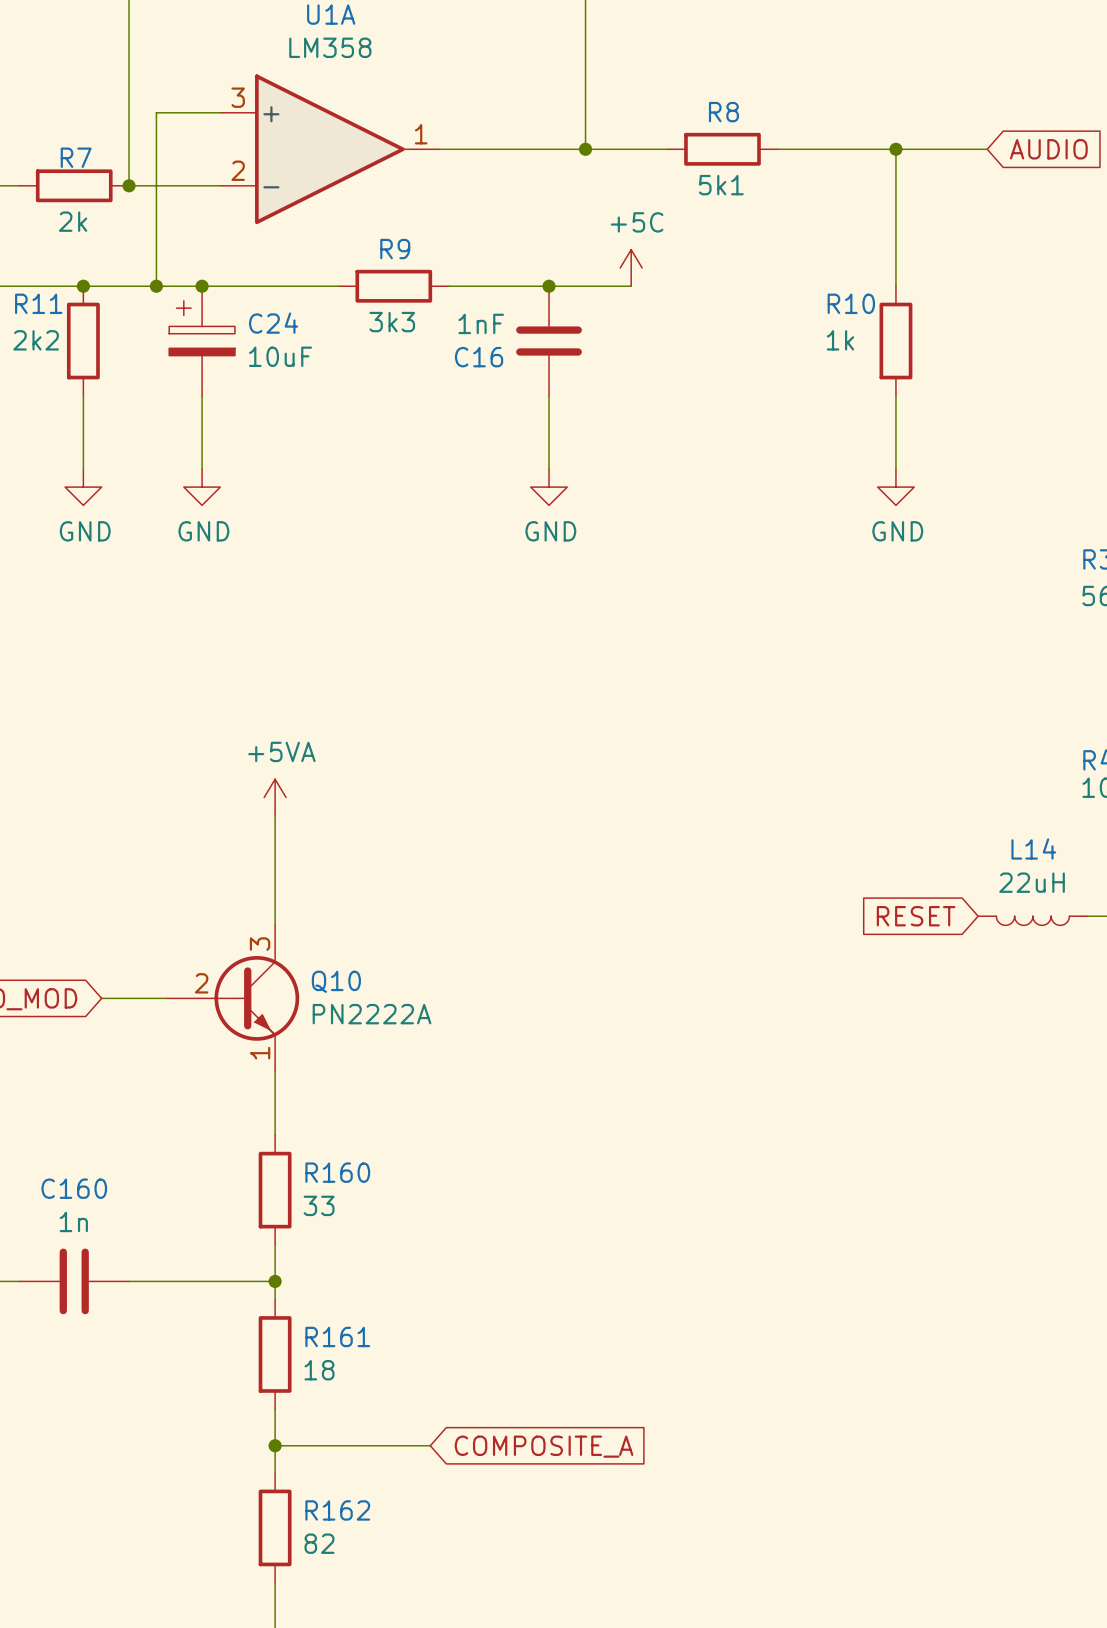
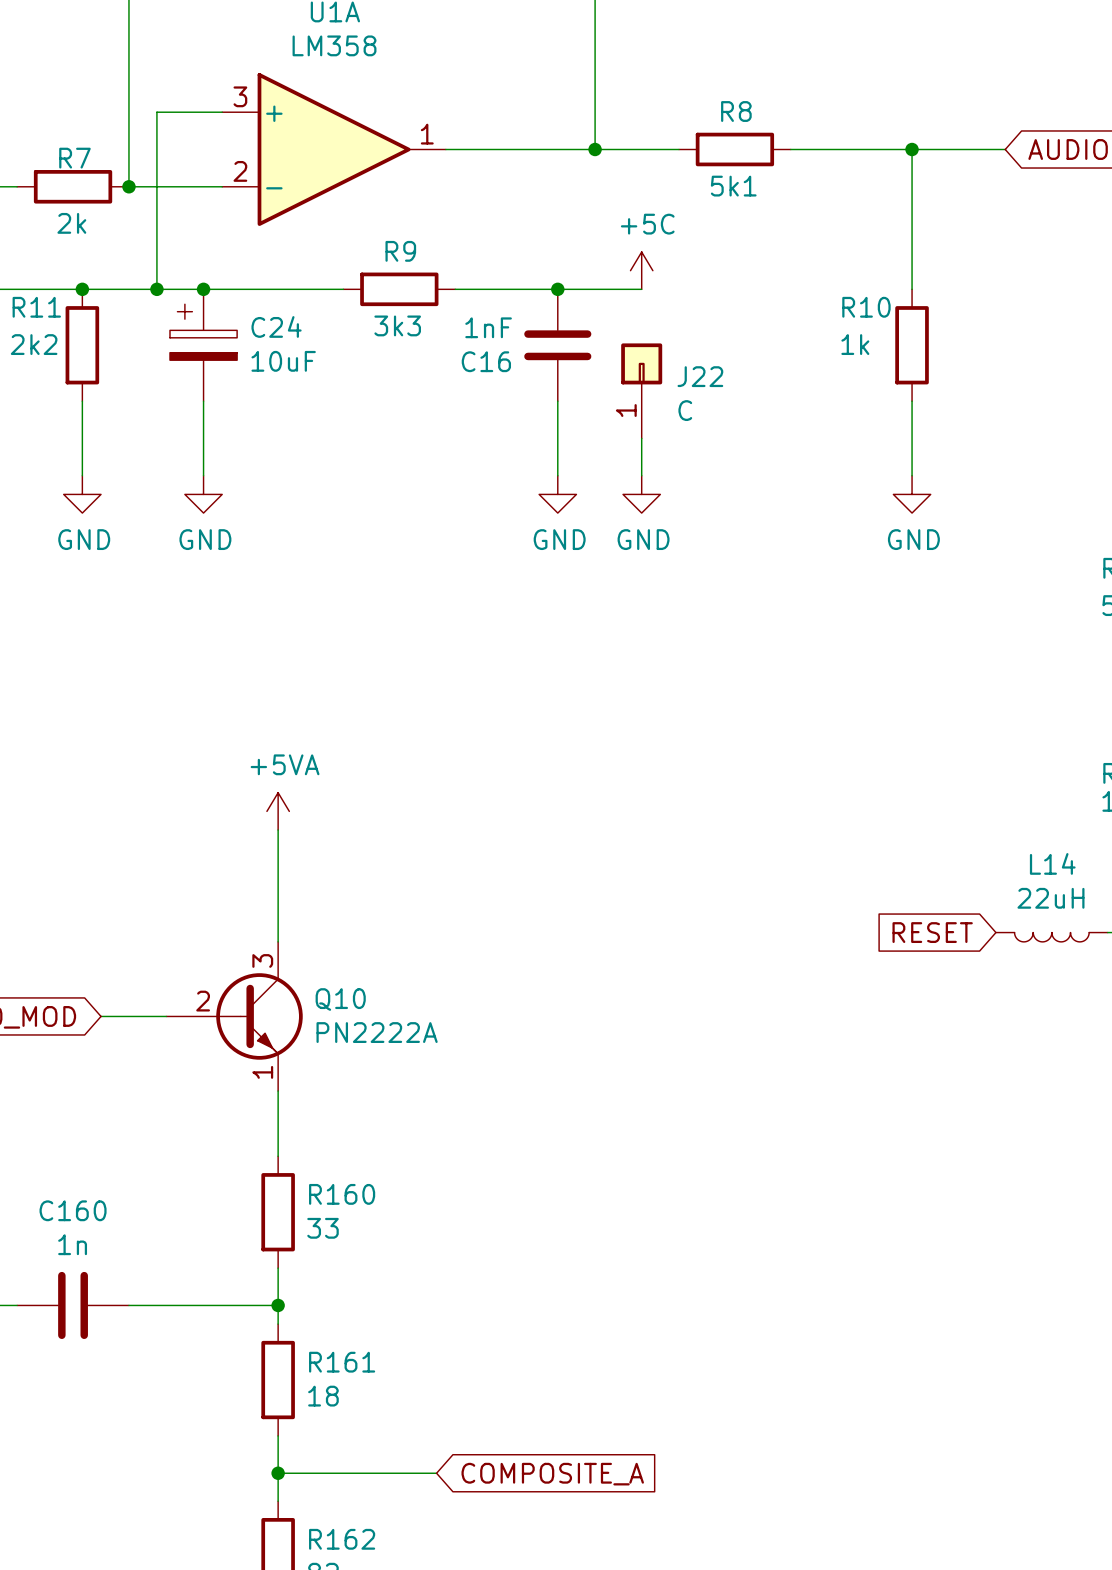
J22: none -> C (641, 390)
wire: none -> (641, 438) (641, 475)
power symbol: none -> GND (641, 494)

